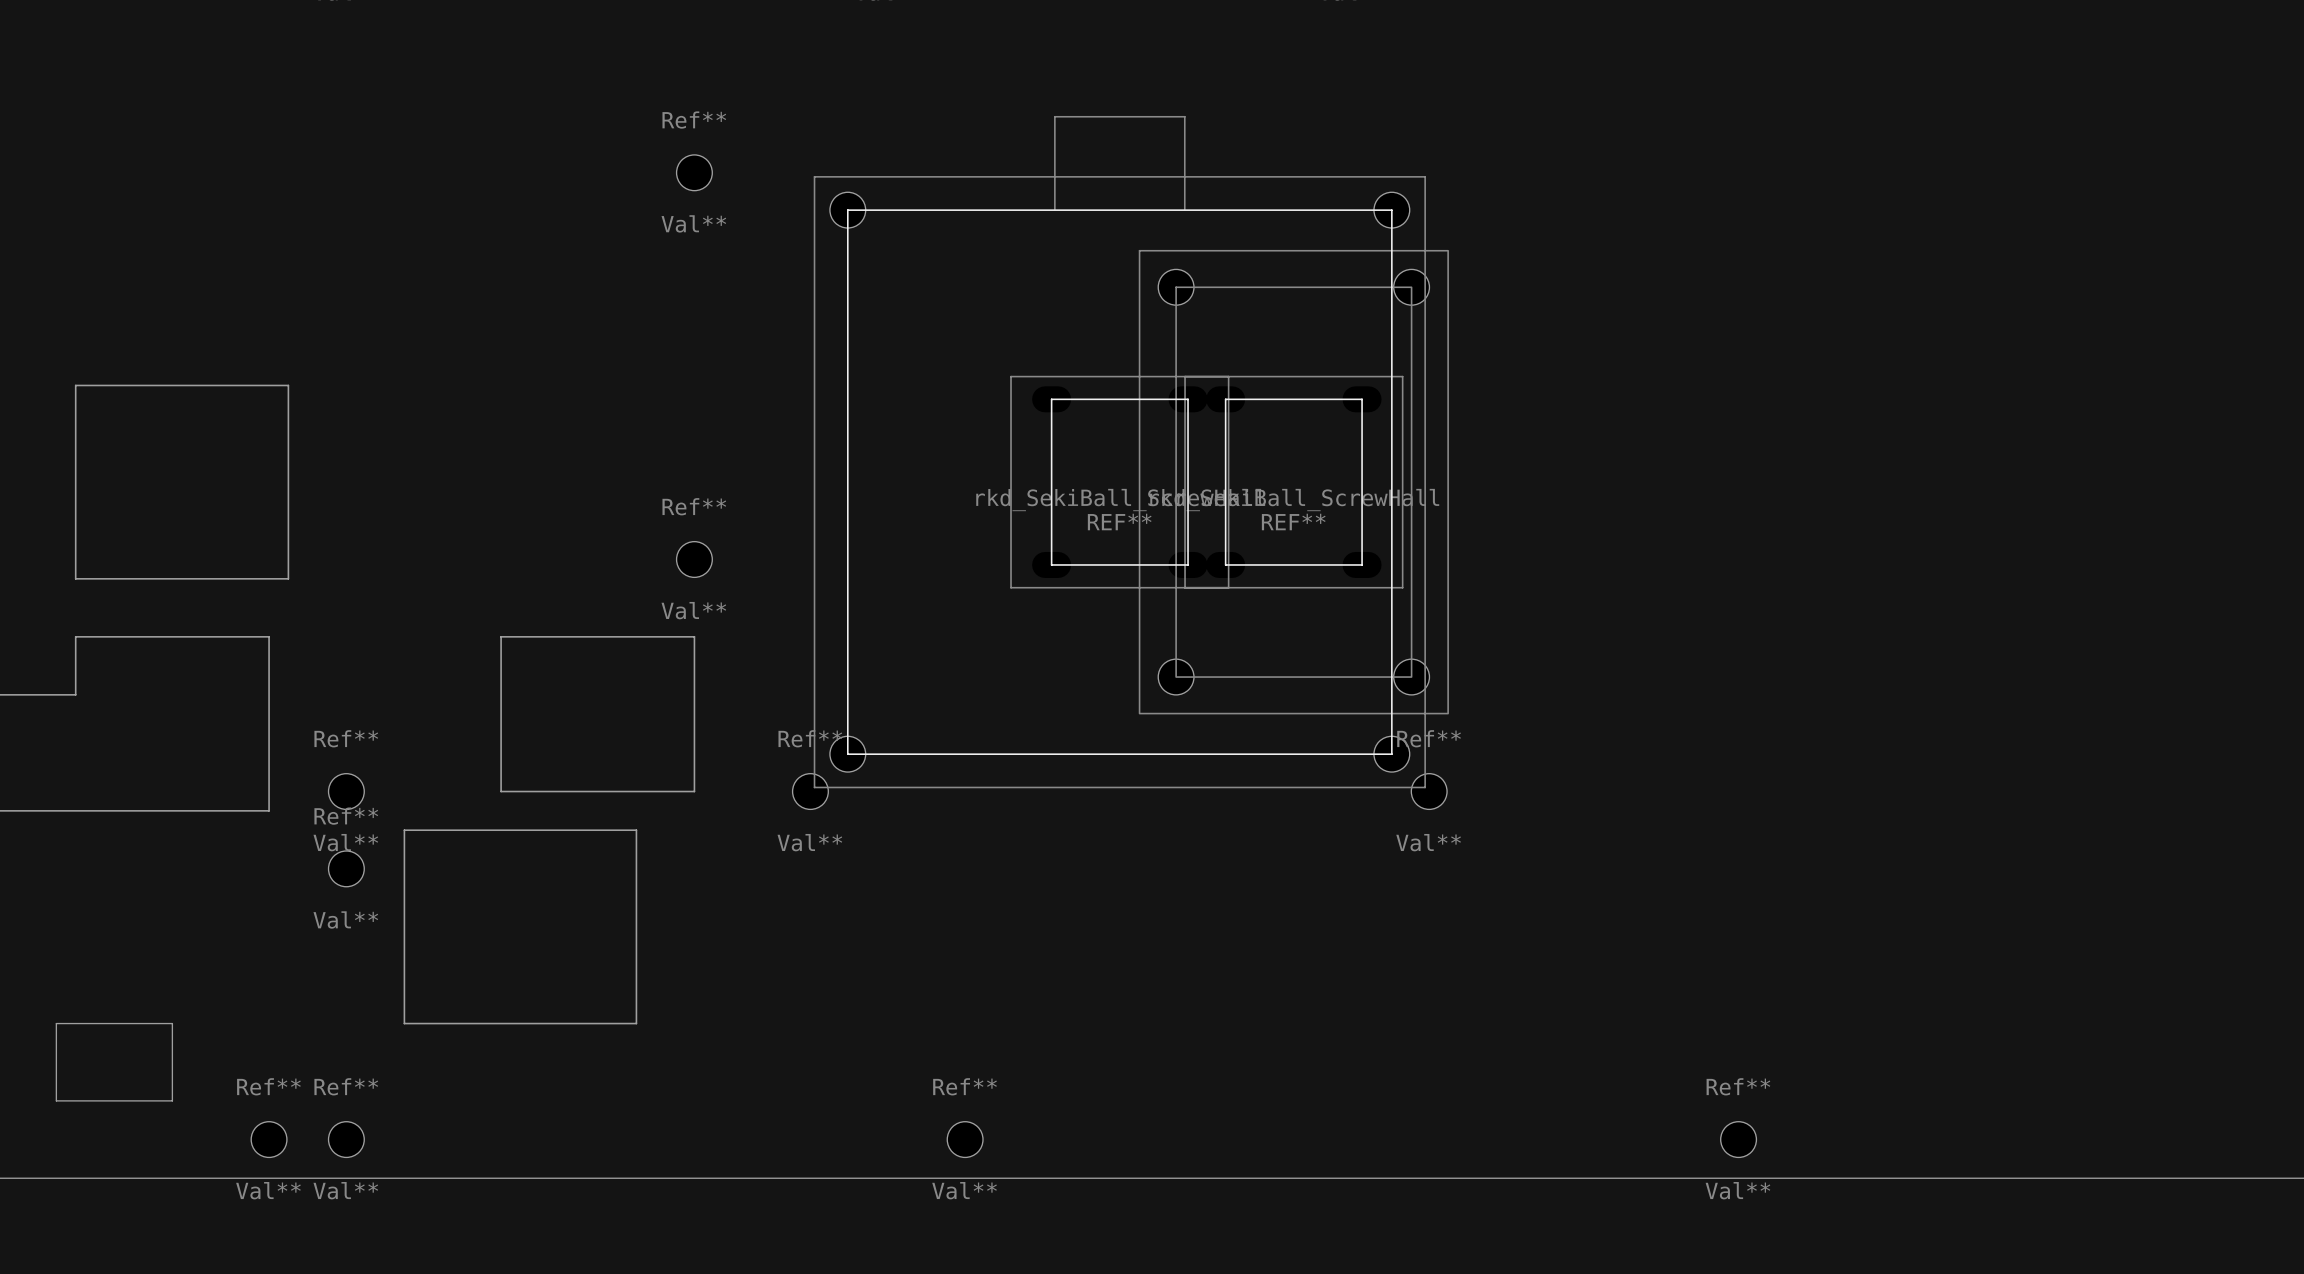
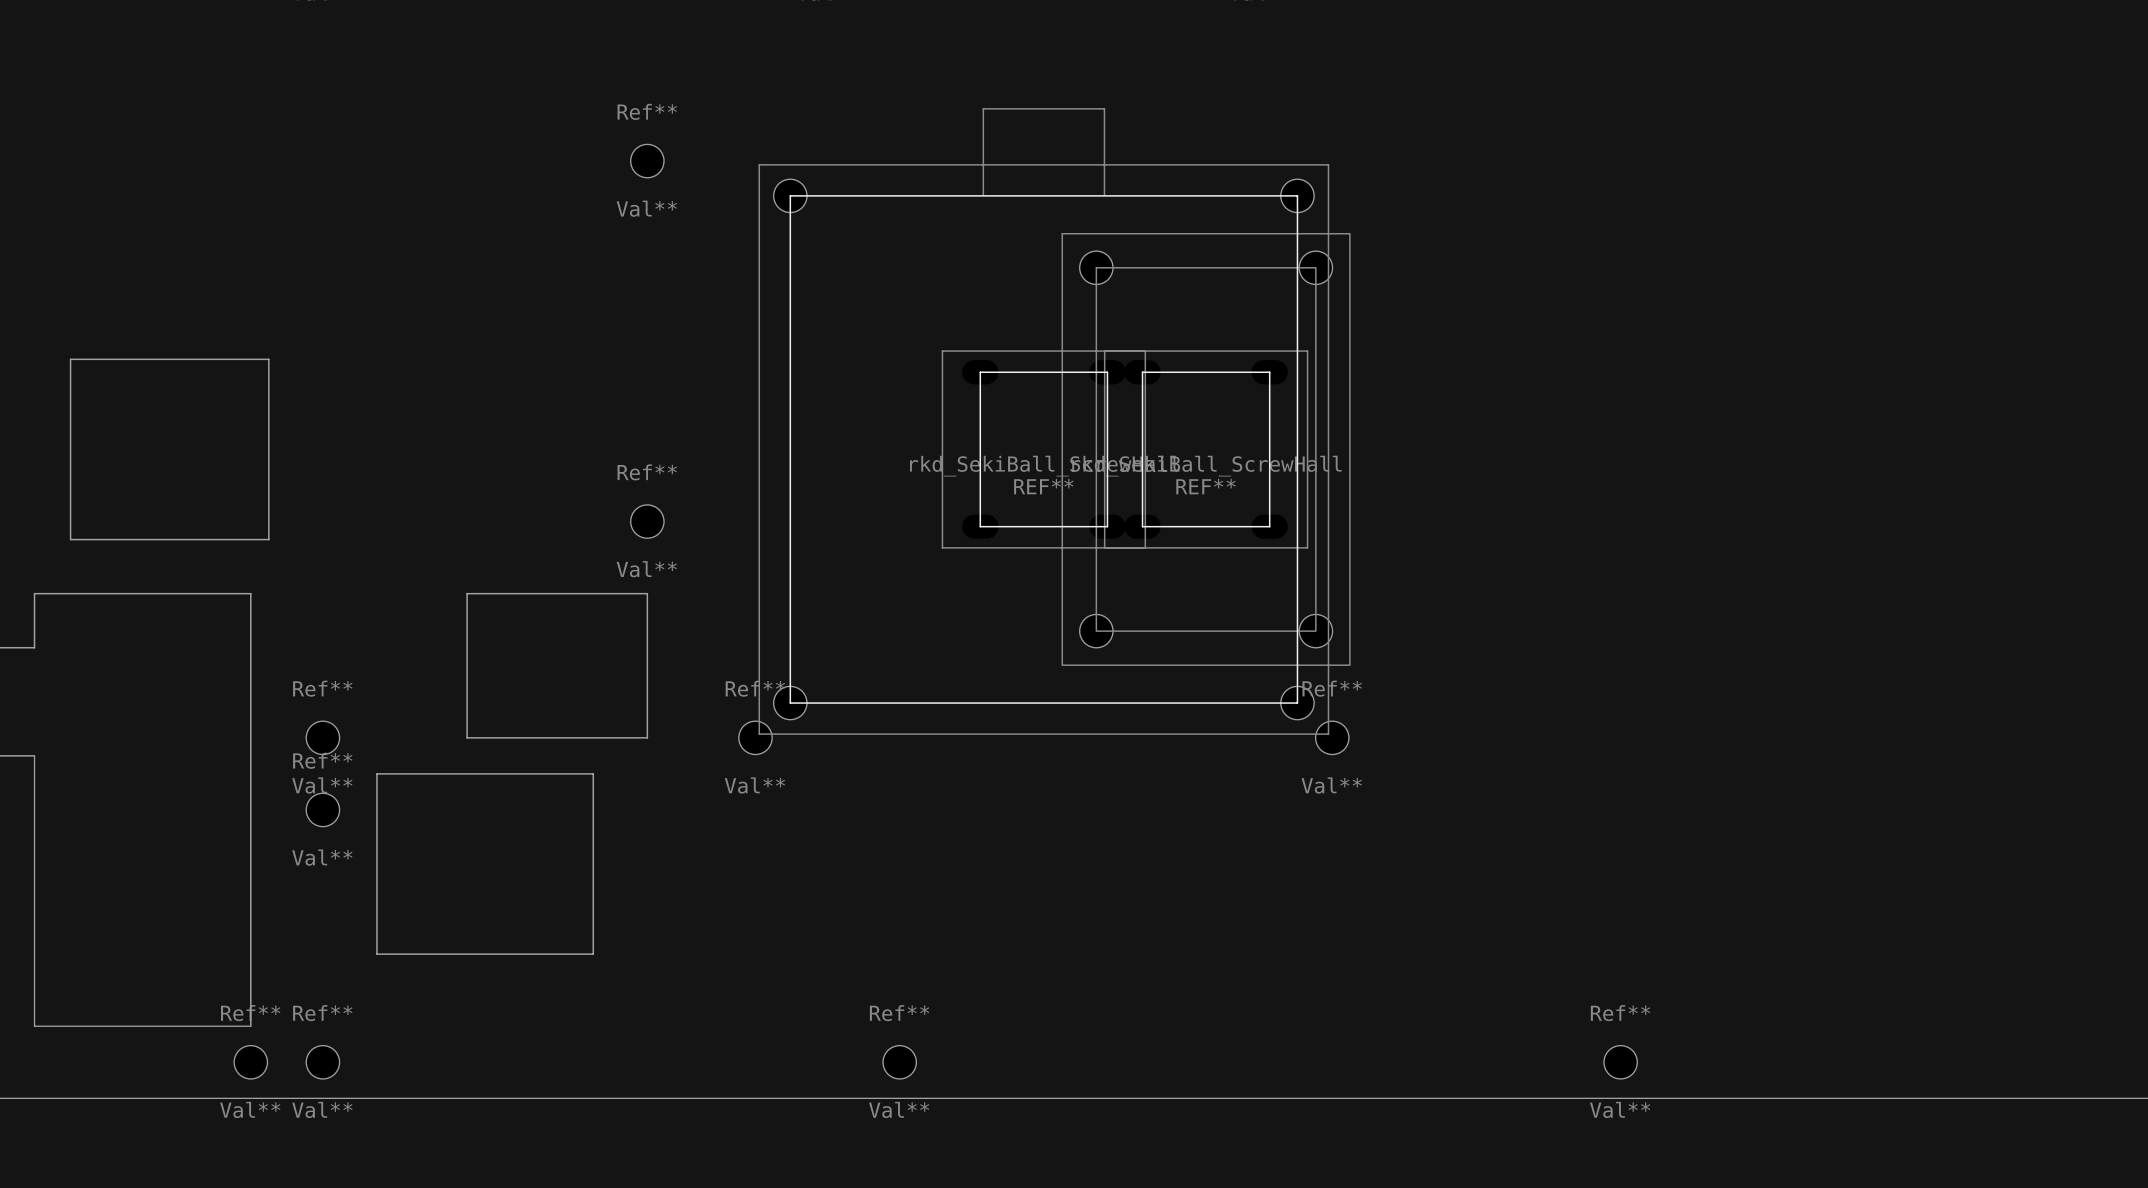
board edge: (75, 636) (75, 694) (37, 694) -> (70, 593) (34, 593) (34, 647)
board edge: (37, 810) (269, 810) -> (160, 1026) (250, 1026) (250, 755)
board edge: (56, 1100) (56, 1023) (172, 1023) (172, 1100) -> (52, 1026) (34, 1026) (34, 755)

